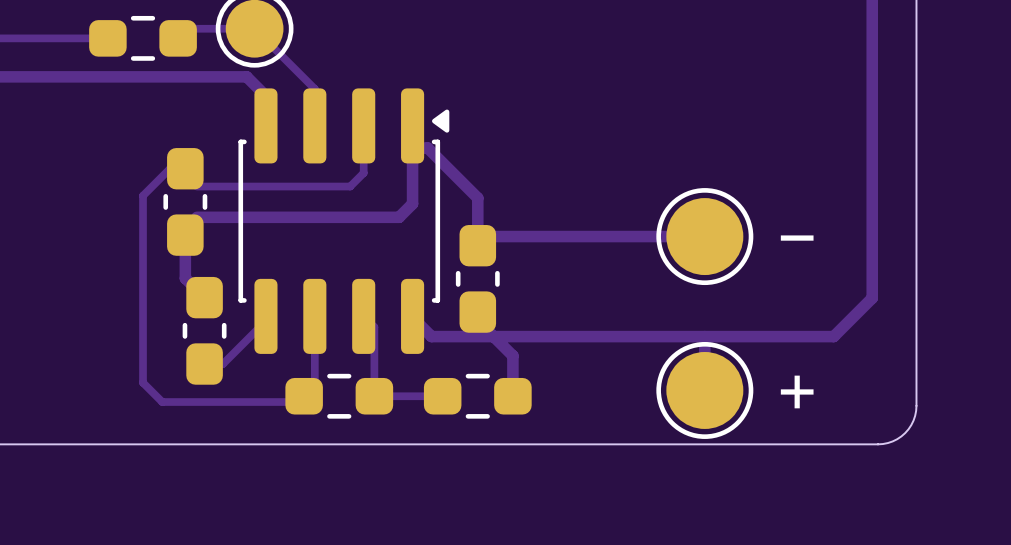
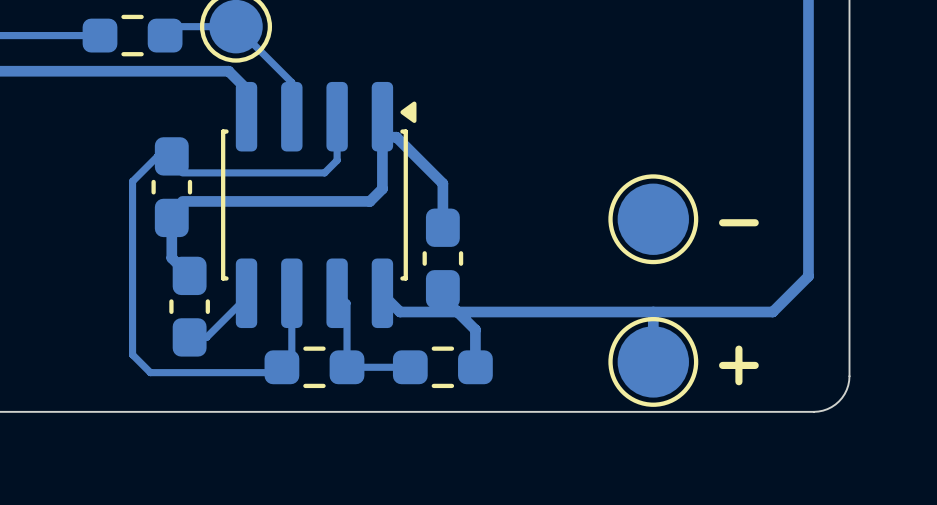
track: (704, 236) (486, 236) (477, 245) -> none

